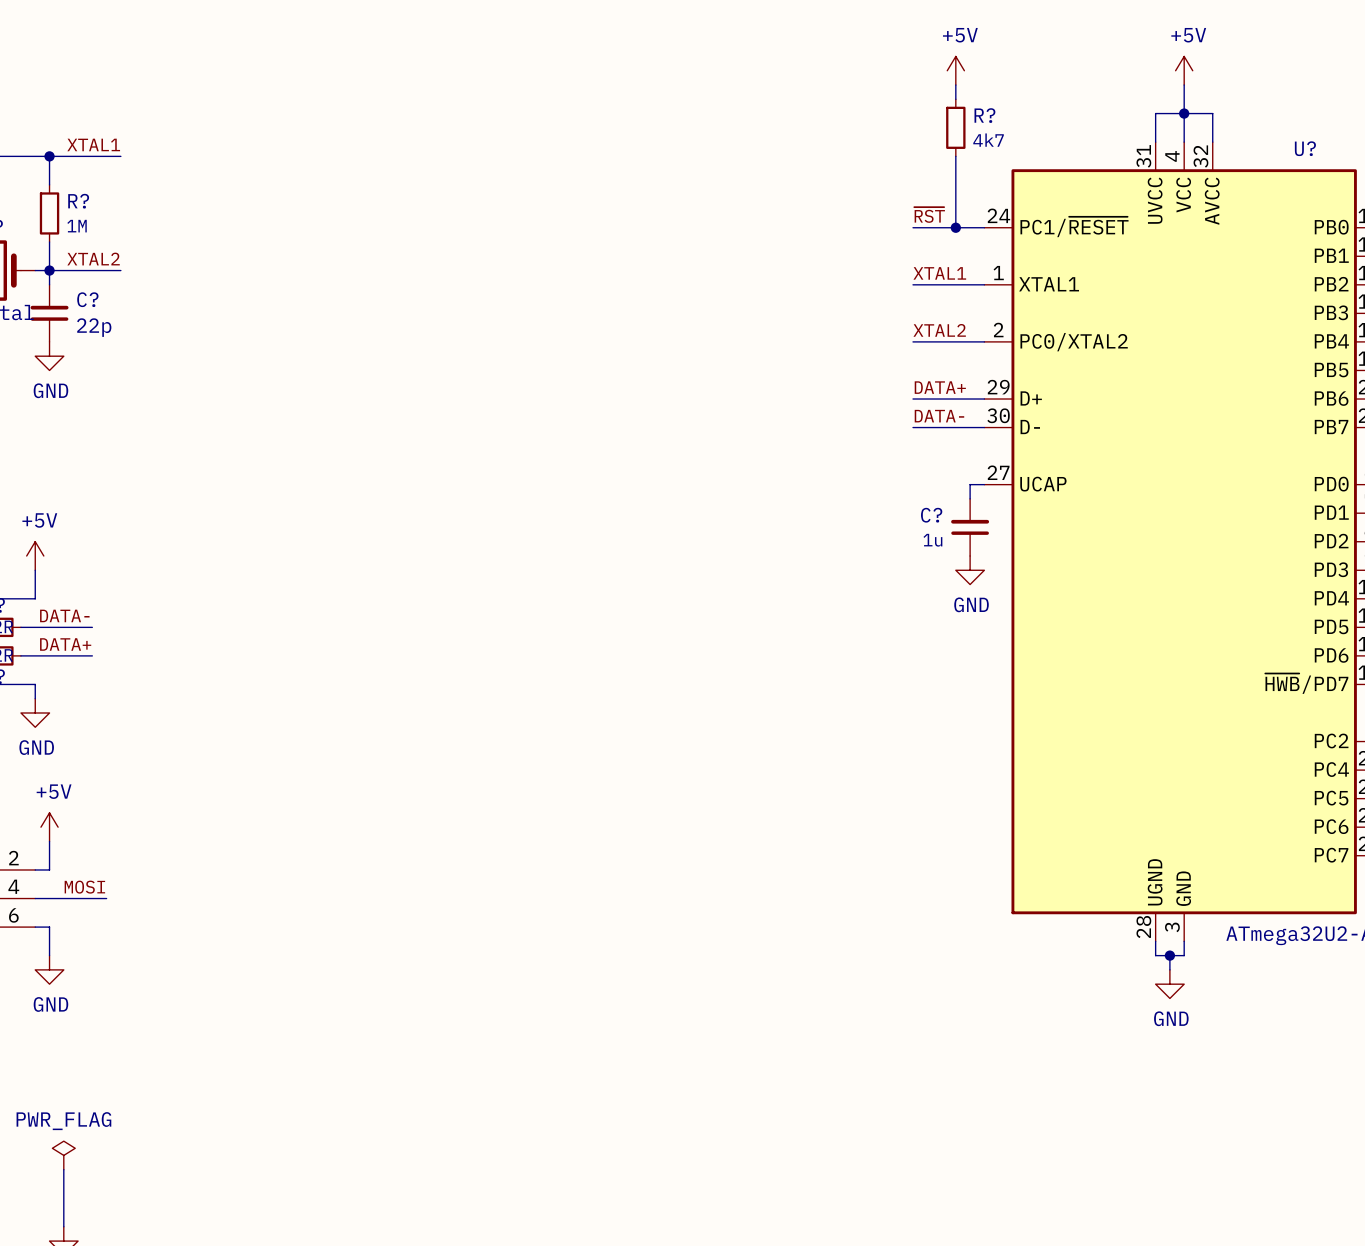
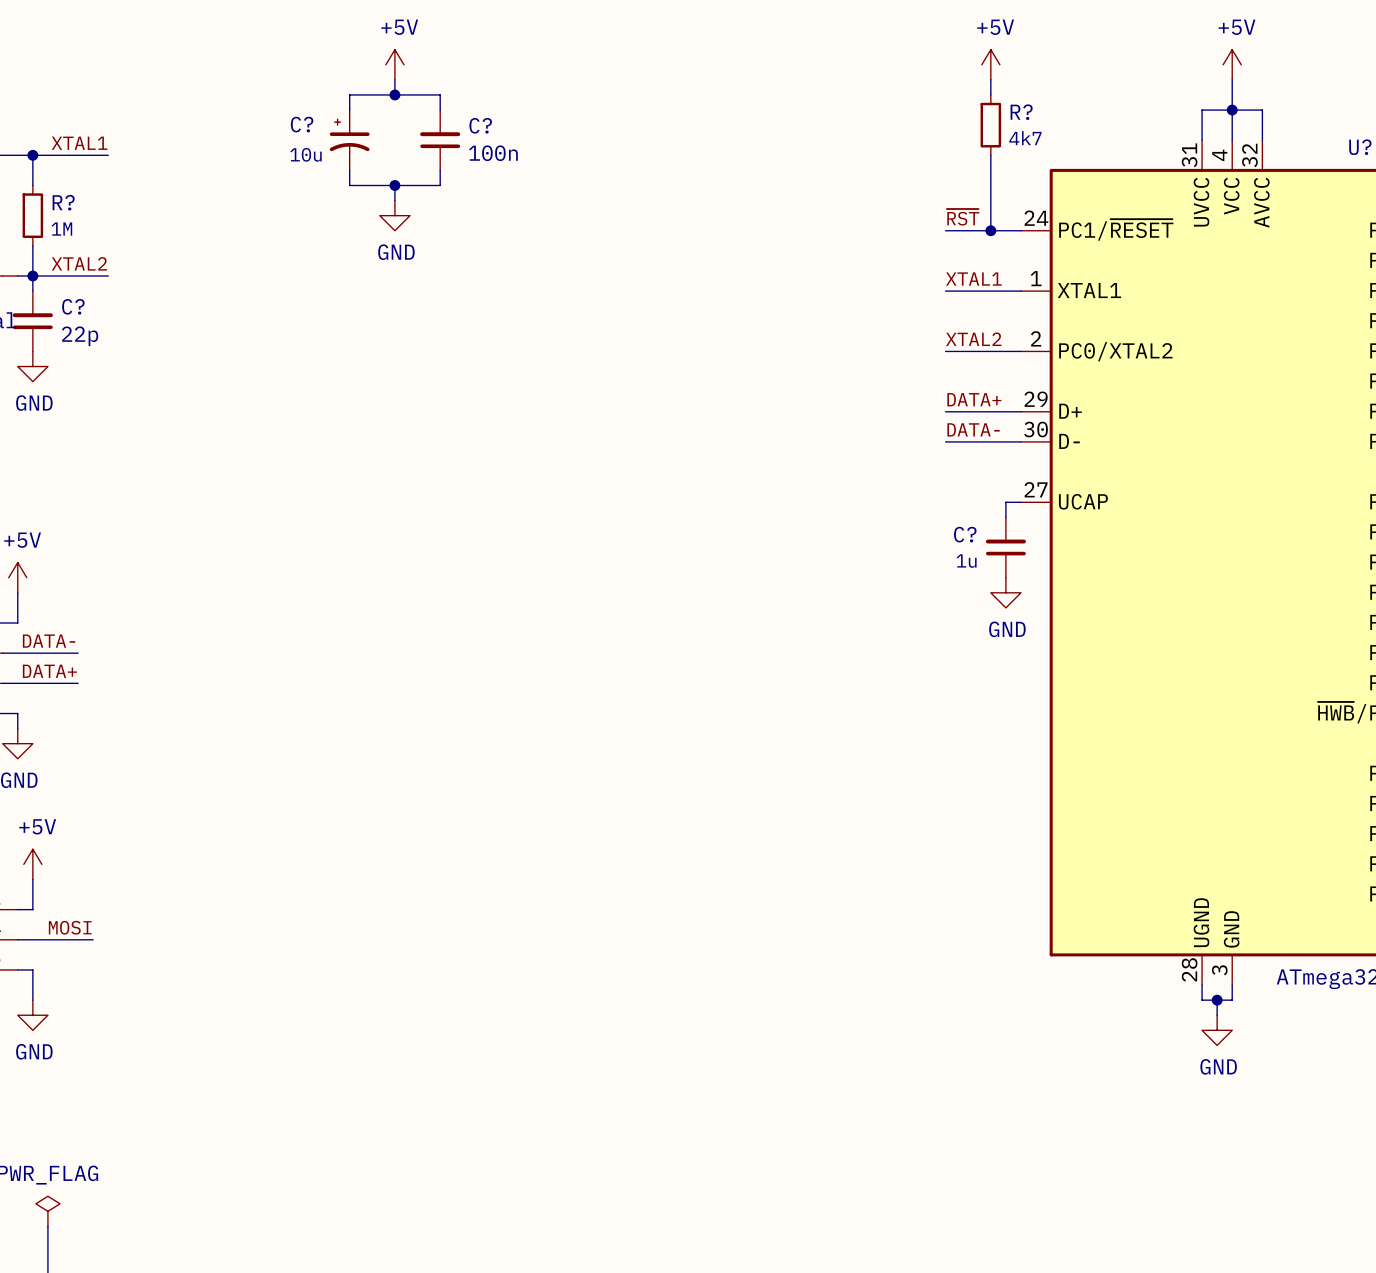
power symbol: none -> +5V (394, 64)
wire: none -> (394, 79) (394, 94)
junction: none -> (394, 94)
wire: none -> (349, 110) (349, 94) (440, 94) (440, 110)
C?: none -> 10u (349, 140)
C?: none -> 100n (440, 140)
wire: none -> (349, 170) (349, 185) (440, 185) (440, 170)
wire: none -> (394, 185) (394, 200)
junction: none -> (394, 185)
power symbol: none -> GND (394, 215)

